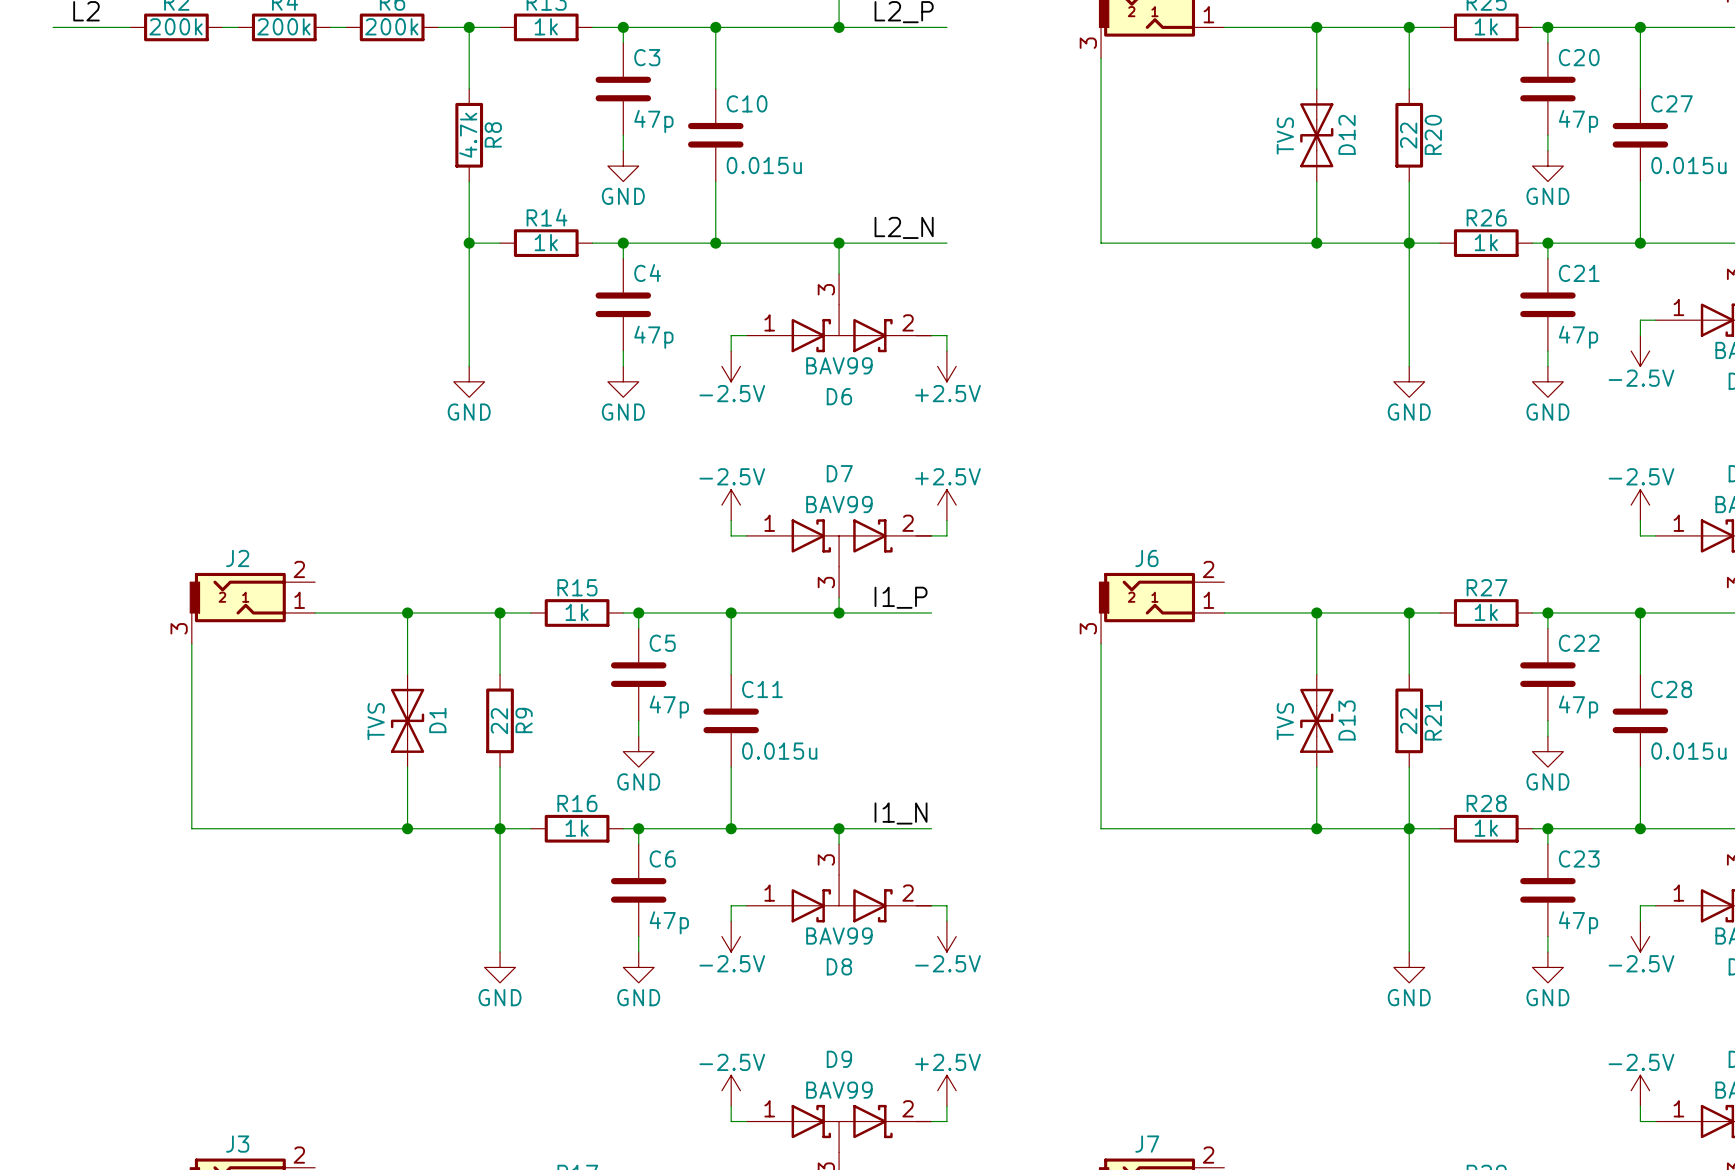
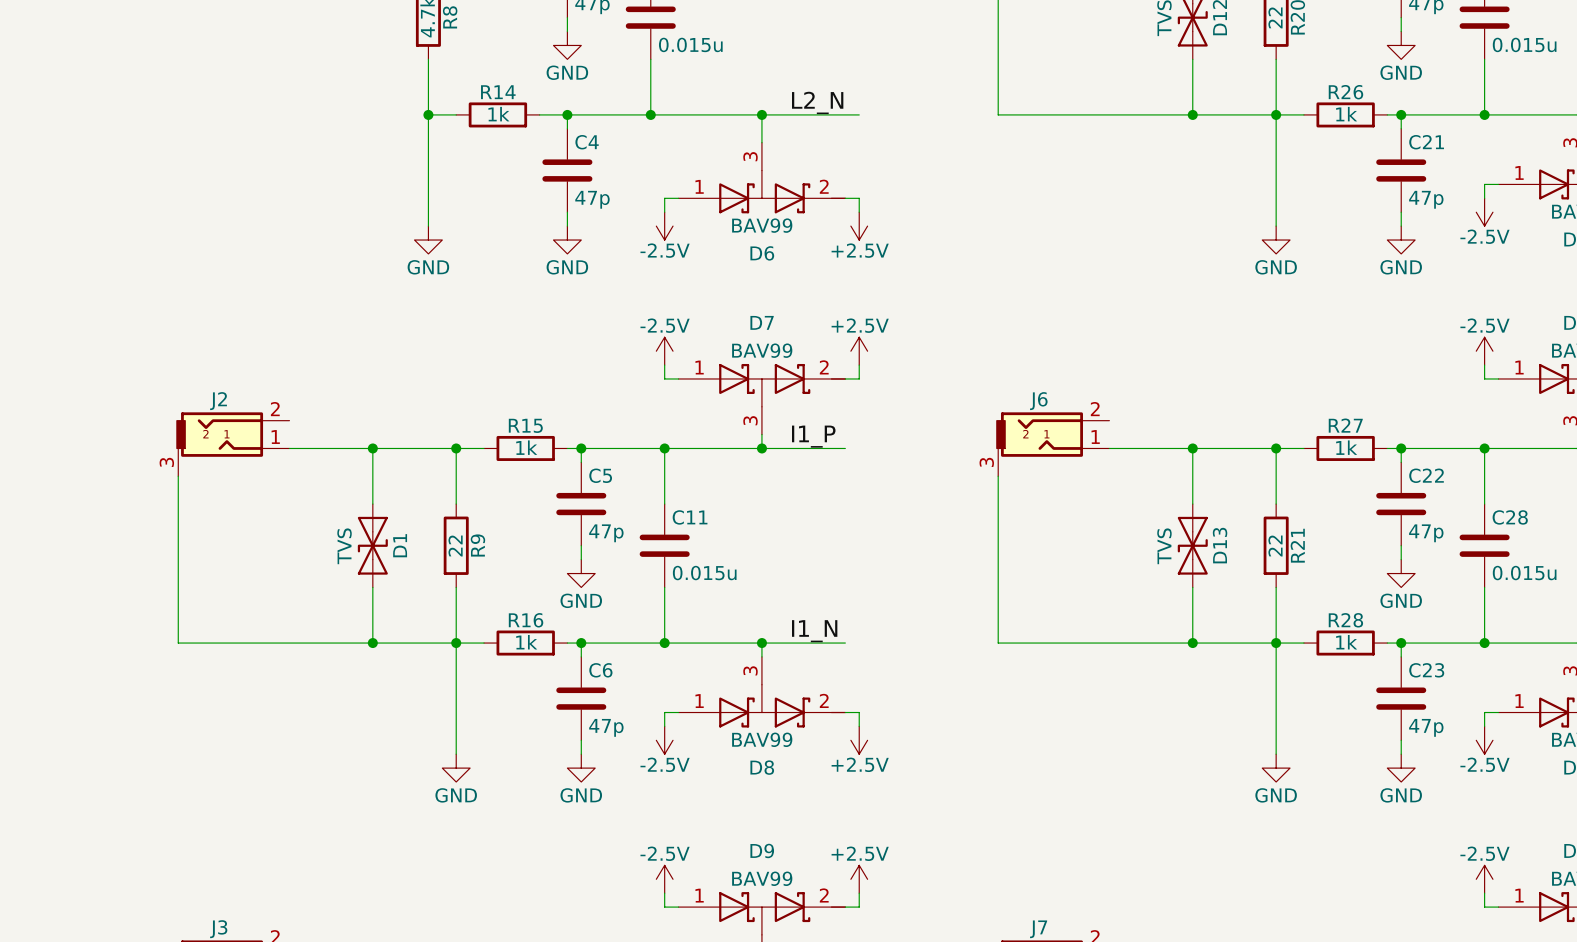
power symbol: -2.5V (946, 936) -> +2.5V (859, 740)

